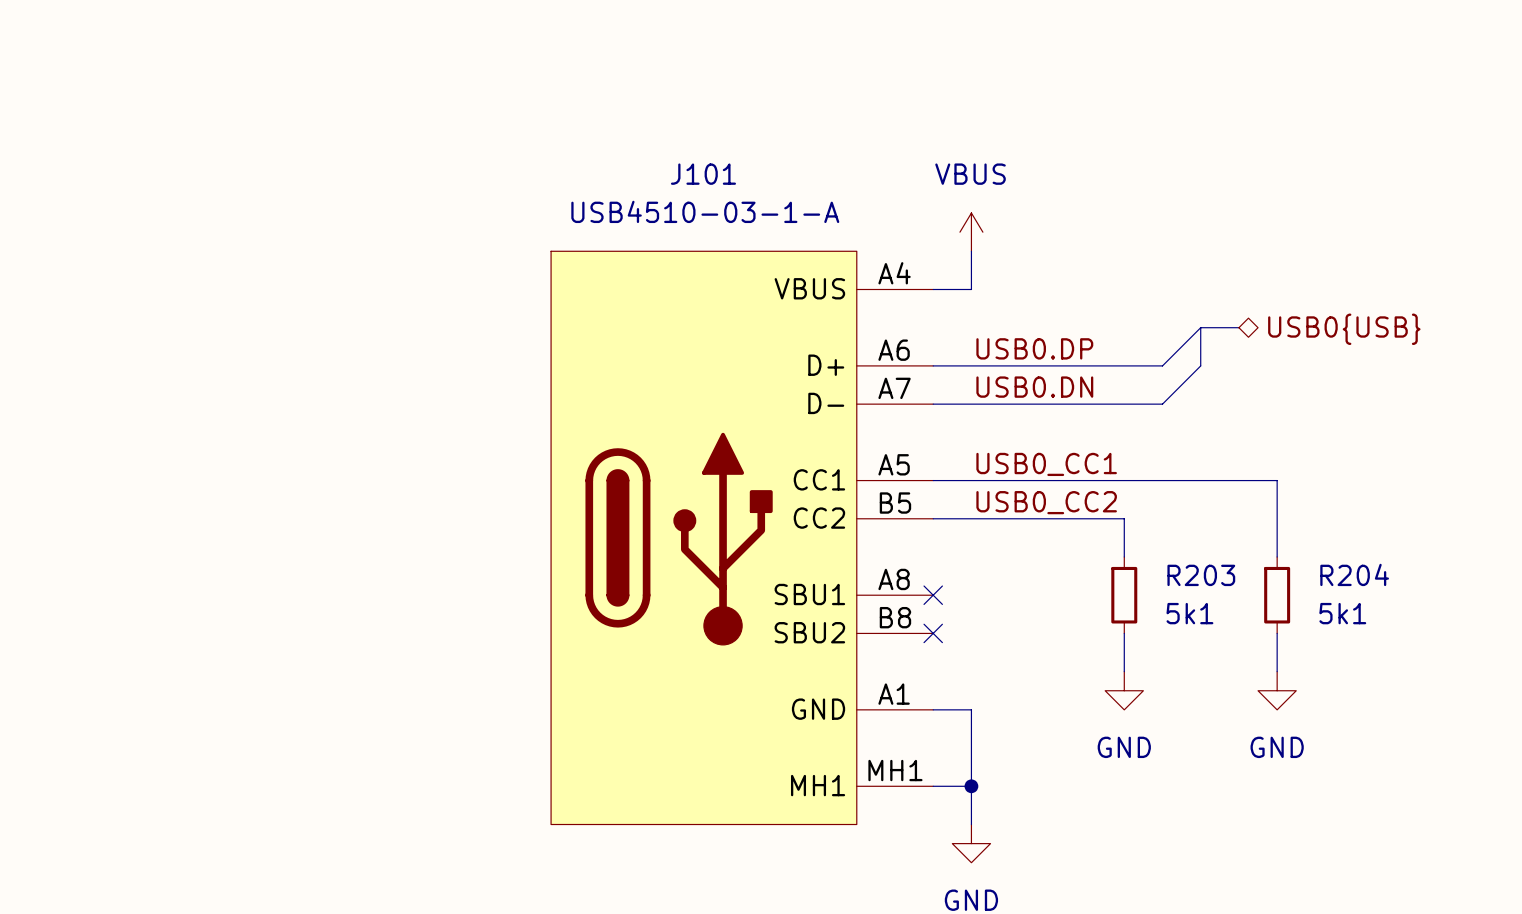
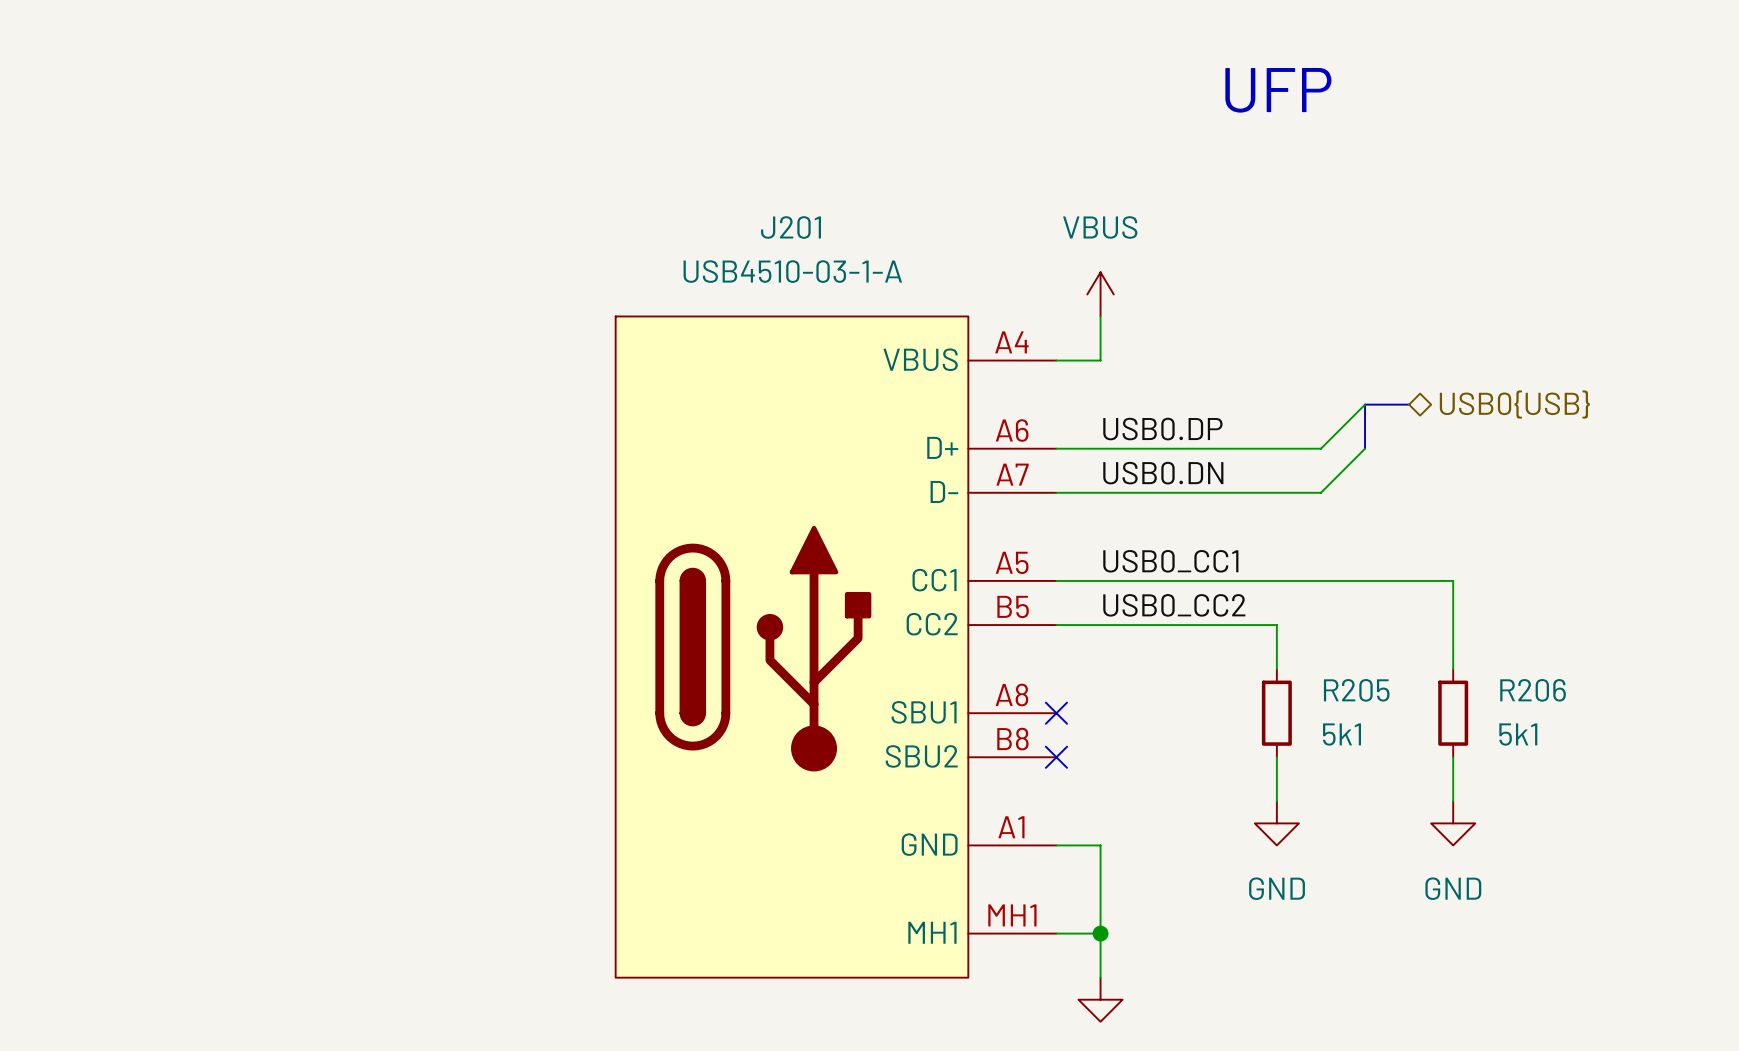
text: none -> UFP (1278, 90)
J101 name: J101 (703, 174) -> J201 (790, 227)
R204 name: R204 (1354, 574) -> R206 (1533, 690)
R203 name: R203 (1201, 575) -> R205 (1356, 690)

